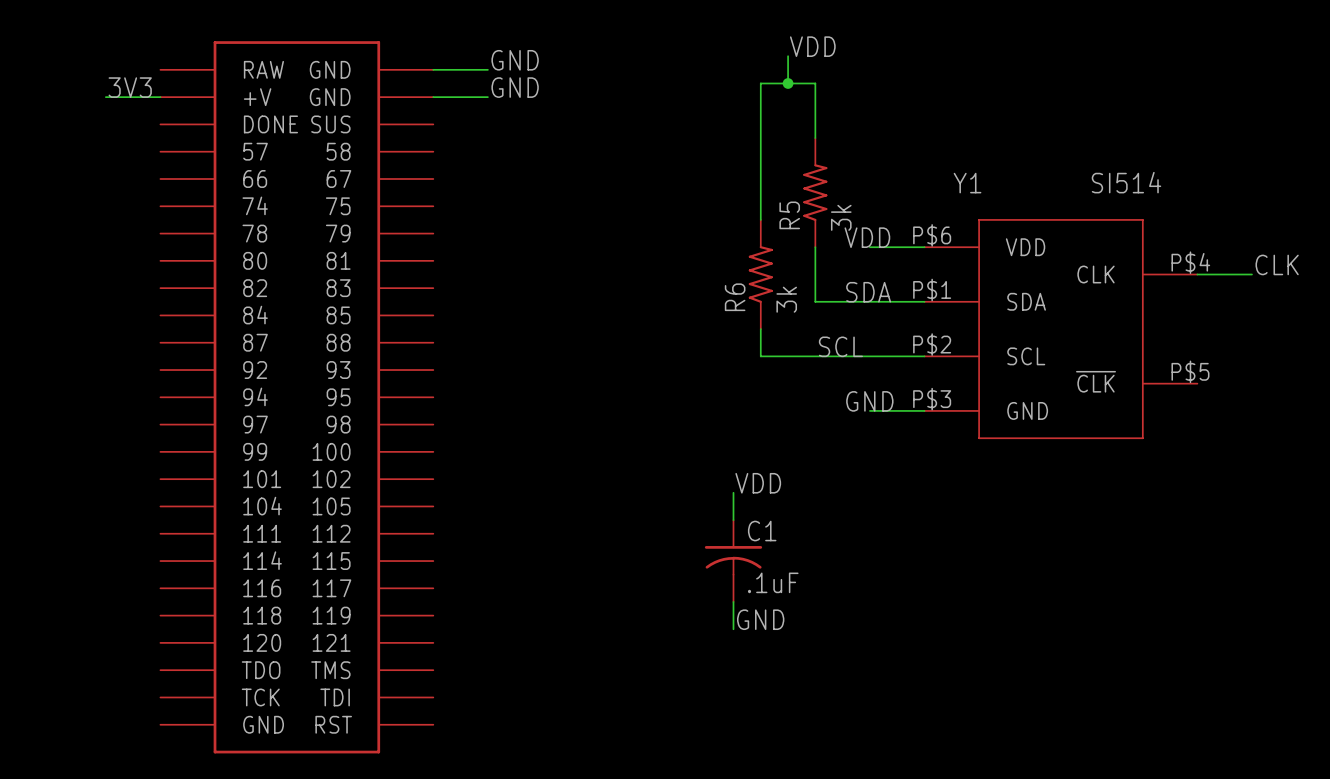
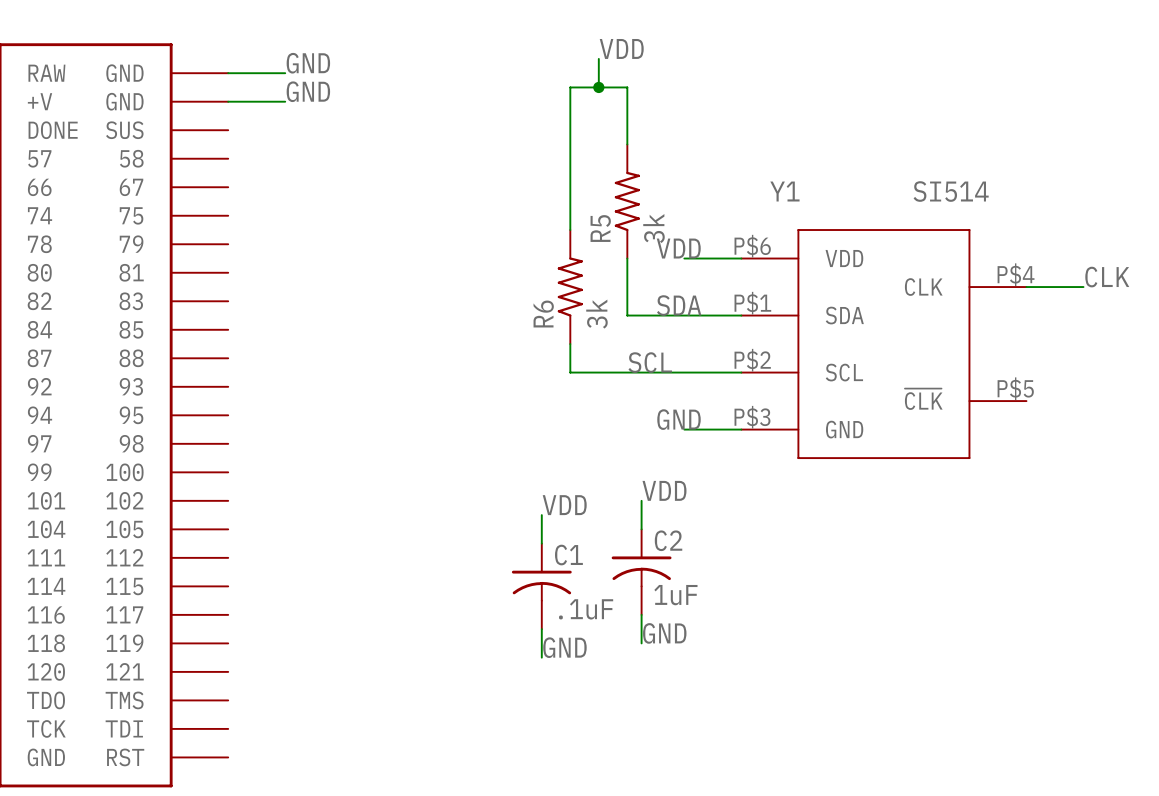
label: none -> VDD (664, 490)
wire: none -> (641, 500) (641, 529)
C2: none -> 1uF (641, 572)
wire: none -> (641, 614) (641, 643)
label: none -> GND (664, 633)

